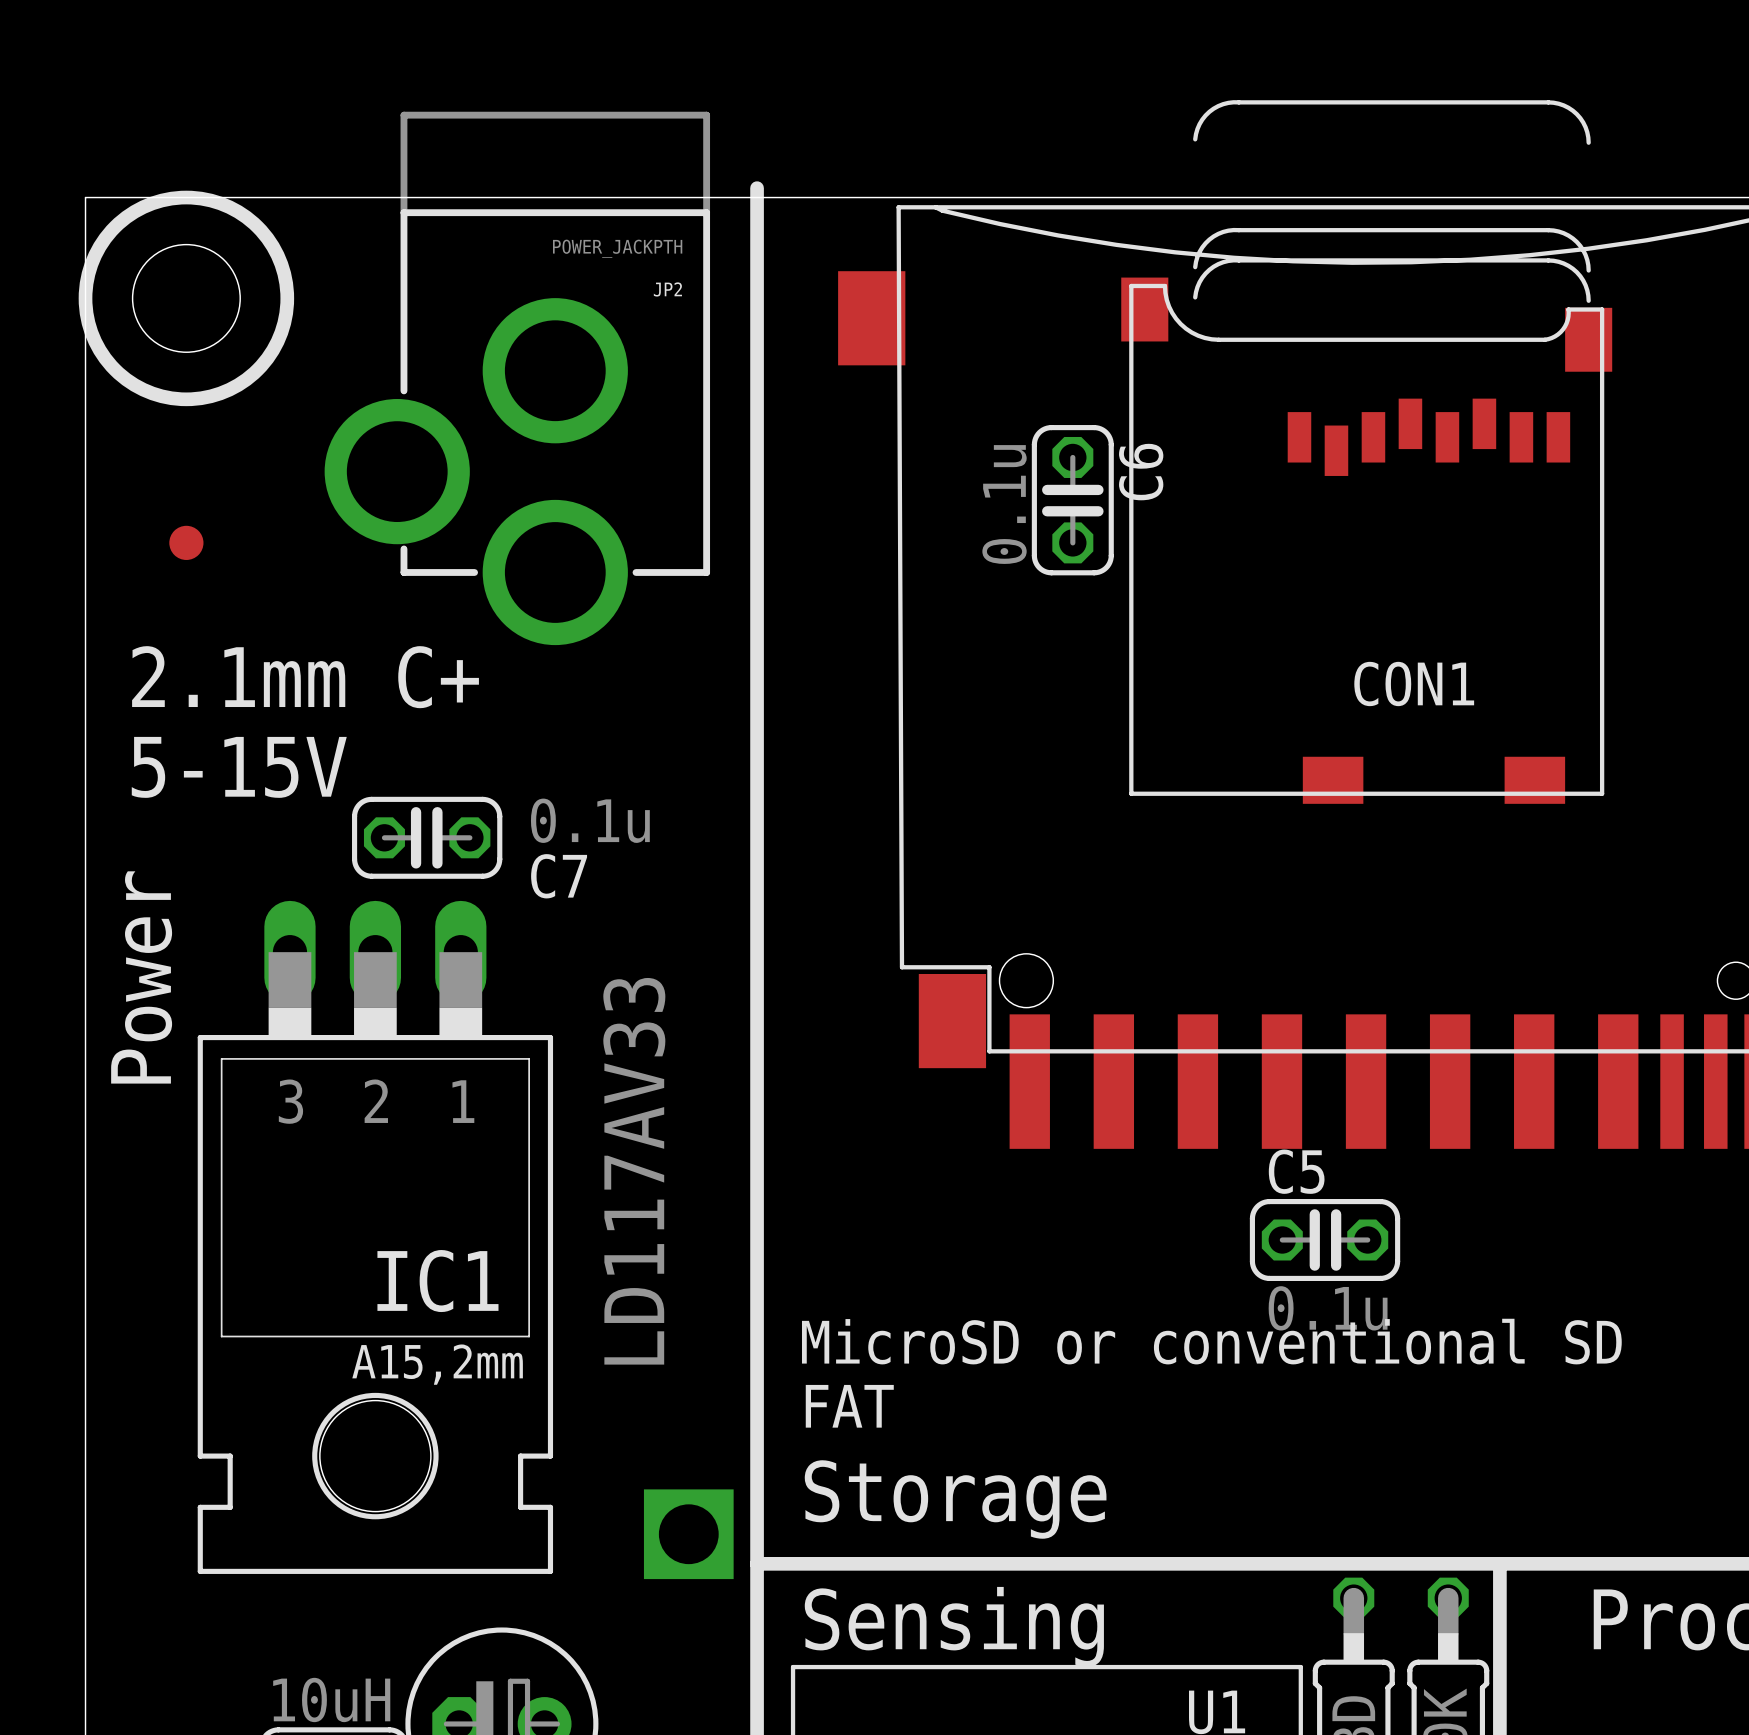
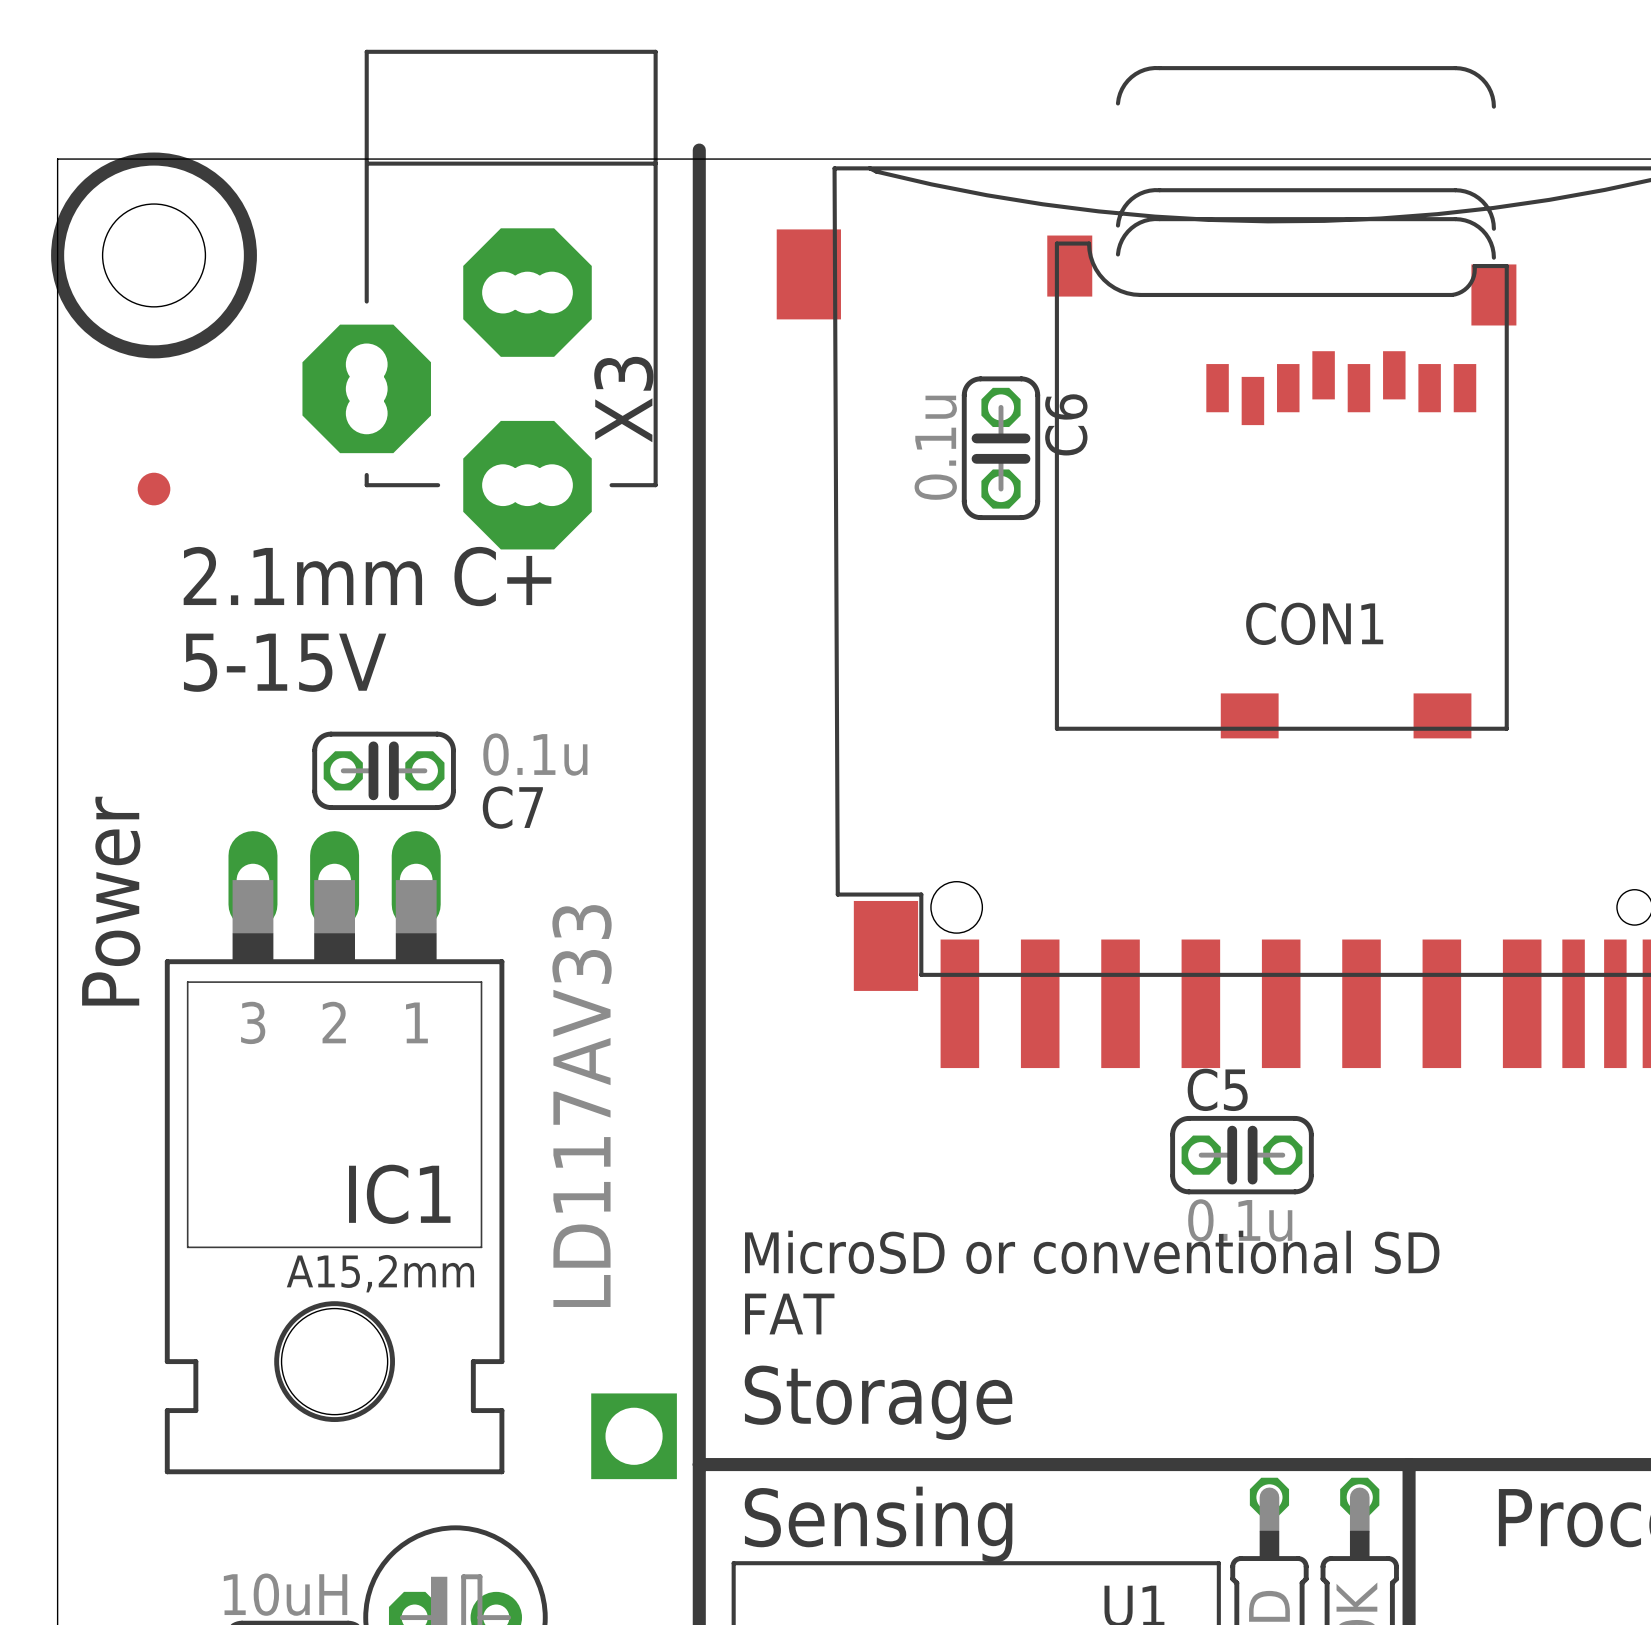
X3: none -> (480, 299)
JP2: POWER_JACKPTH (517, 378) -> none
text position: 2.1mm C+ (305, 677) -> 2.1mm C+ (367, 576)
text position: 5-15V (239, 767) -> 5-15V (285, 662)

